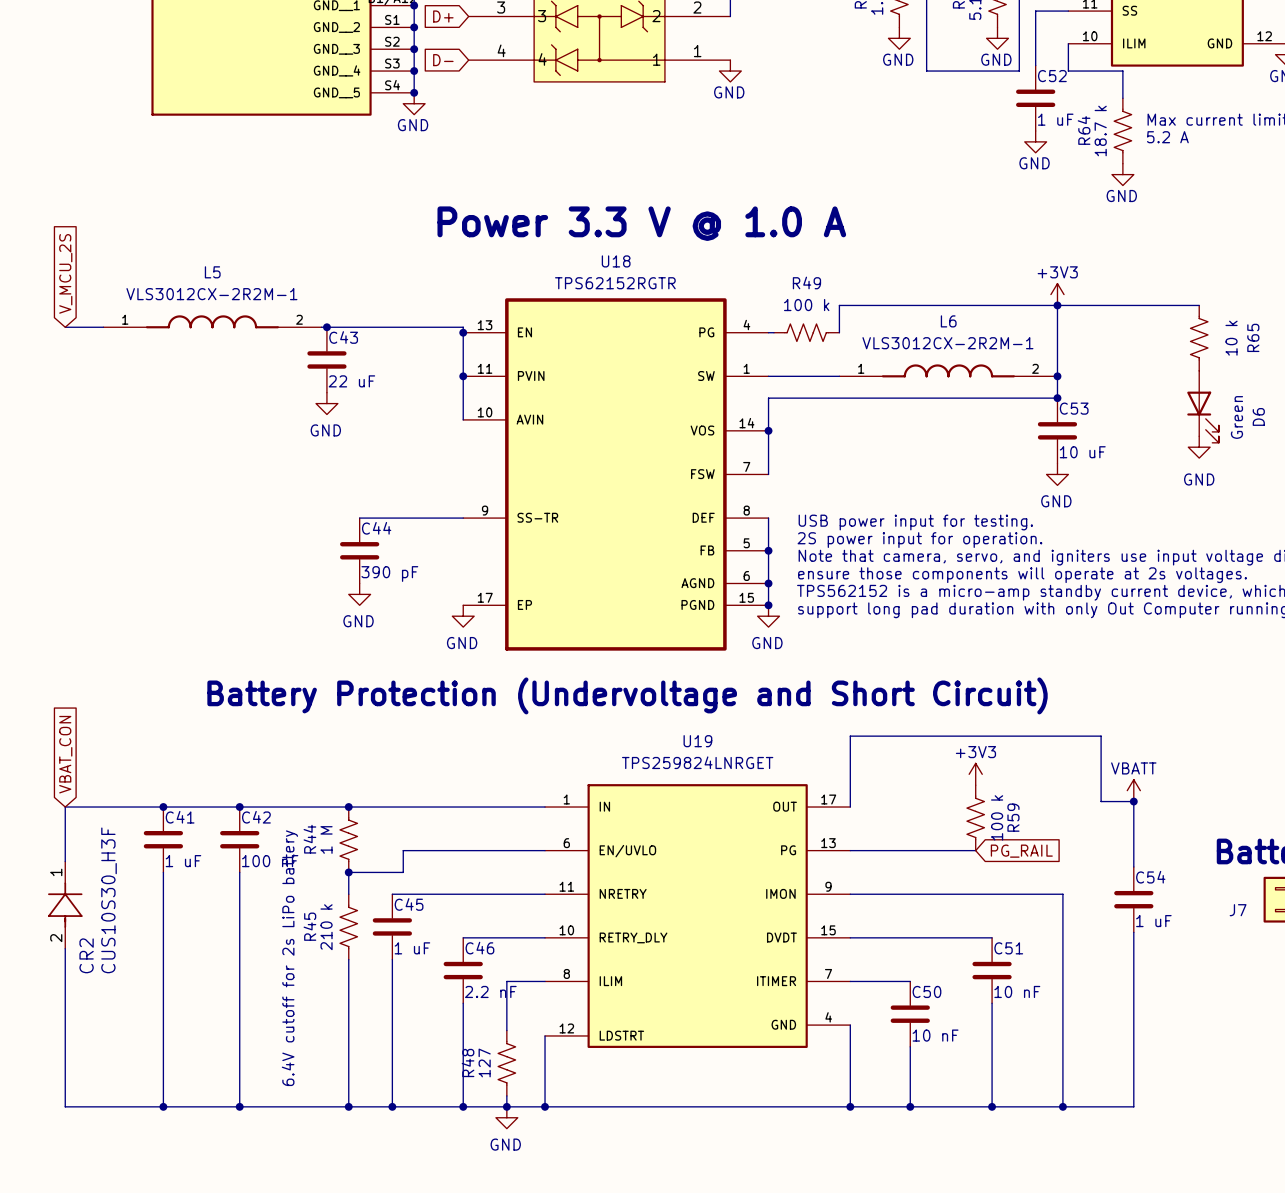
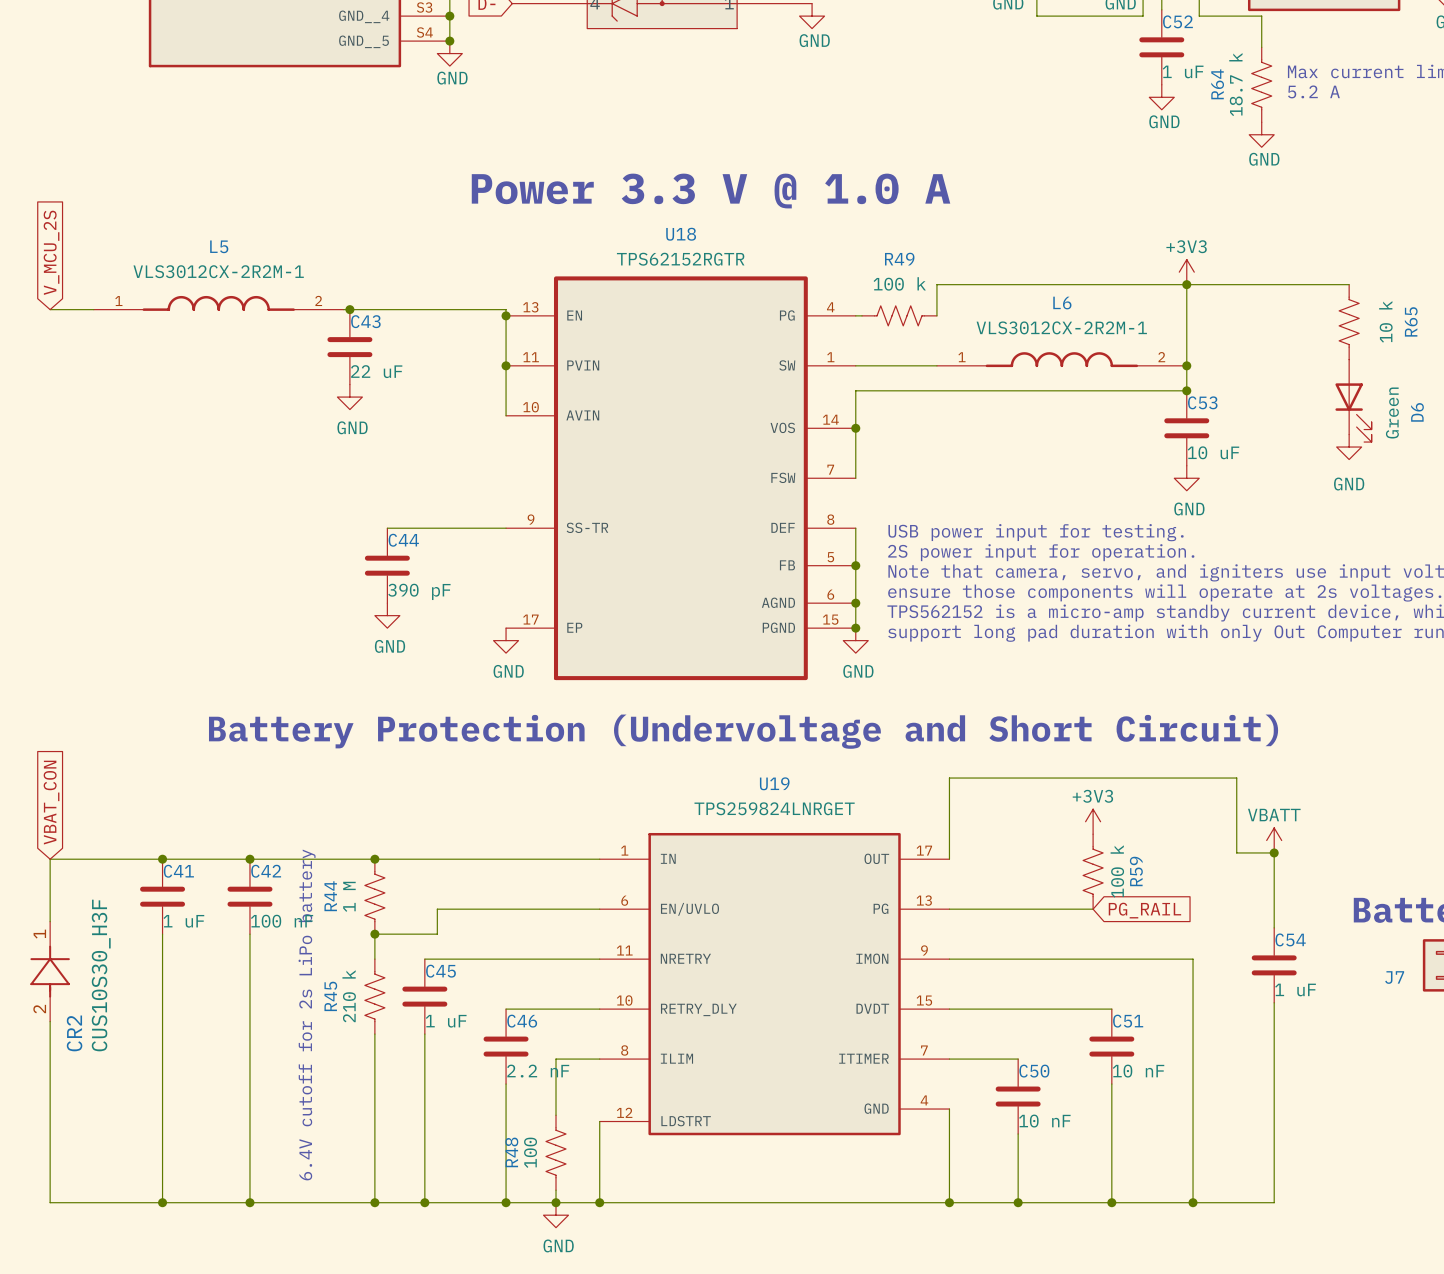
R48 value: 127 (484, 1062) -> 100 (530, 1152)

